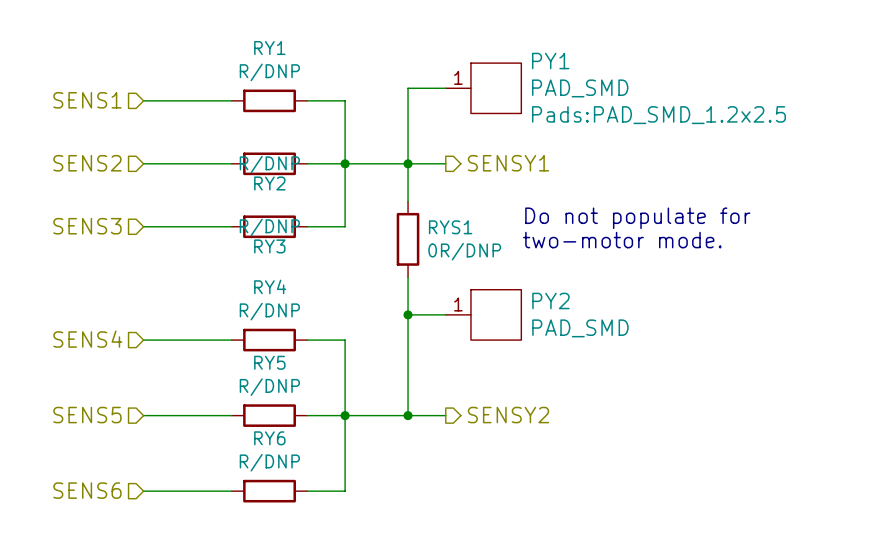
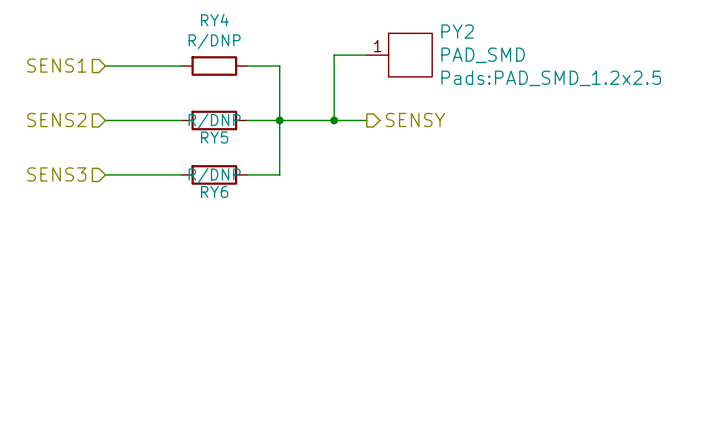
RY1 name: RY1 (269, 48) -> RY4 (214, 20)
PY1 name: PY1 (550, 61) -> PY2 (457, 31)
wire: (408, 163) (408, 201) -> none
hierarchical label: SENSY1 (508, 163) -> SENSY (415, 119)
RY2 name: RY2 (269, 183) -> RY5 (214, 137)
text: Do not populate for (637, 218) -> none
RYS1: 0R/DNP (408, 239) -> none
text: two-motor mode. (622, 240) -> none
RY3 name: RY3 (269, 246) -> RY6 (214, 191)
wire: (408, 277) (408, 415) -> none
wire: (408, 314) (445, 314) -> none
junction: (408, 314) -> none
PY2: PAD_SMD (483, 314) -> none
hierarchical label: SENS4 (87, 339) -> none
wire: (143, 340) (231, 340) -> none
RY4: R/DNP (269, 340) -> none
wire: (307, 340) (345, 340) (345, 491) (307, 491) -> none
hierarchical label: SENS5 (87, 415) -> none
wire: (143, 415) (231, 415) -> none
RY5: R/DNP (269, 415) -> none
wire: (307, 415) (445, 415) -> none
junction: (345, 415) -> none
junction: (408, 415) -> none
hierarchical label: SENSY2 (508, 415) -> none
hierarchical label: SENS6 (87, 490) -> none
wire: (143, 491) (231, 491) -> none
RY6: R/DNP (269, 491) -> none

